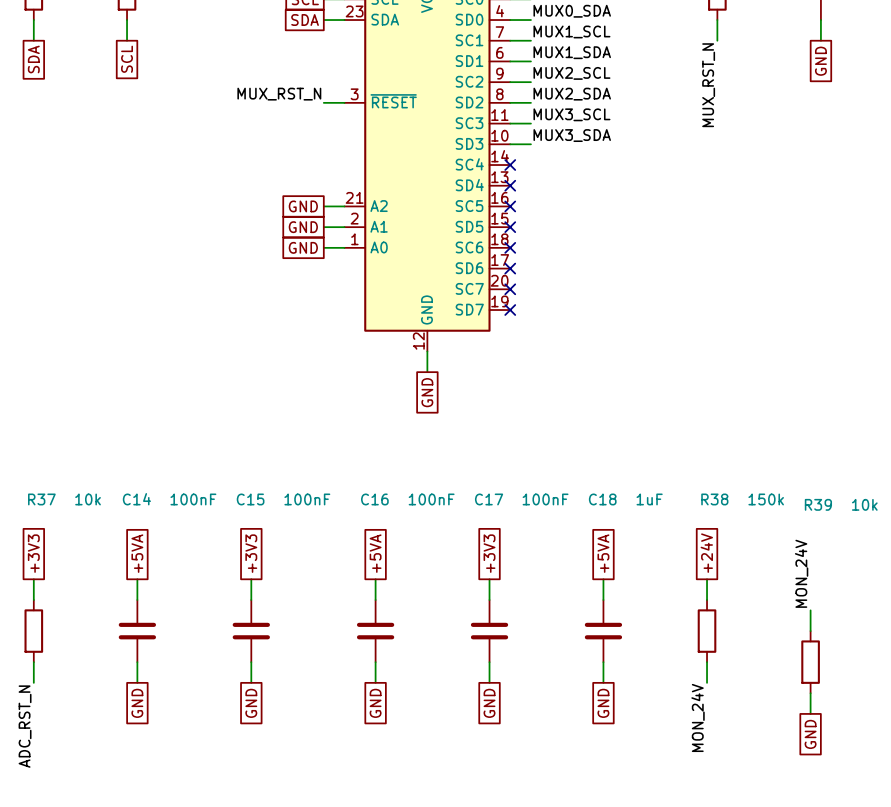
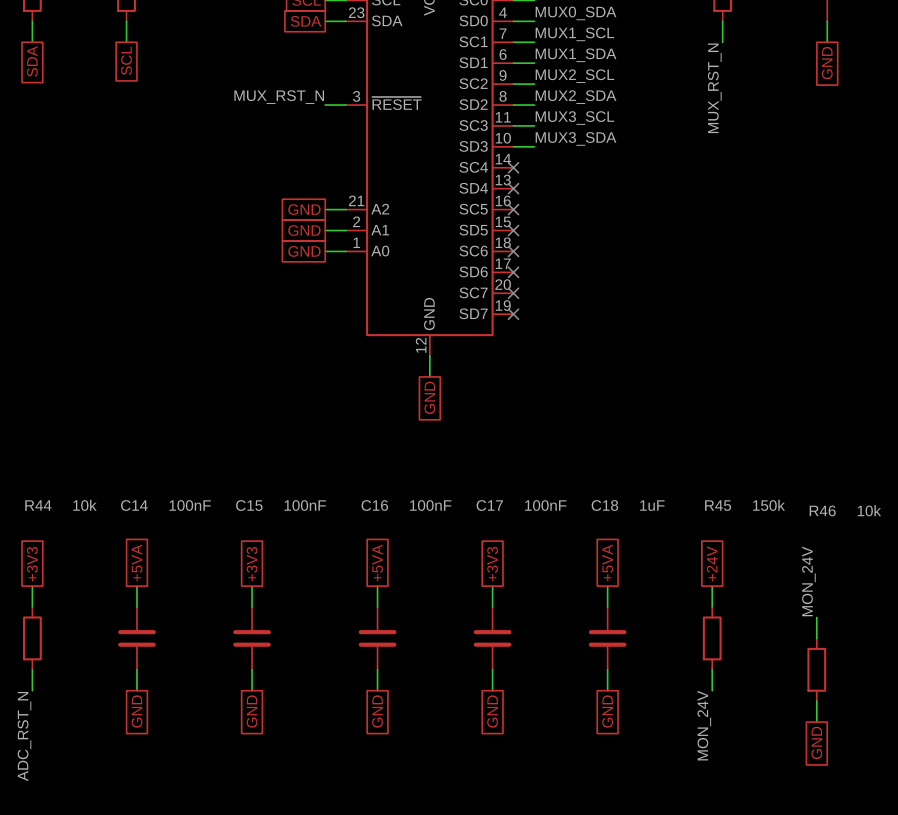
R37 name: R37 (41, 499) -> R44 (38, 505)
R38 name: R38 (714, 499) -> R45 (718, 505)
R39 name: R39 (818, 504) -> R46 (822, 510)

